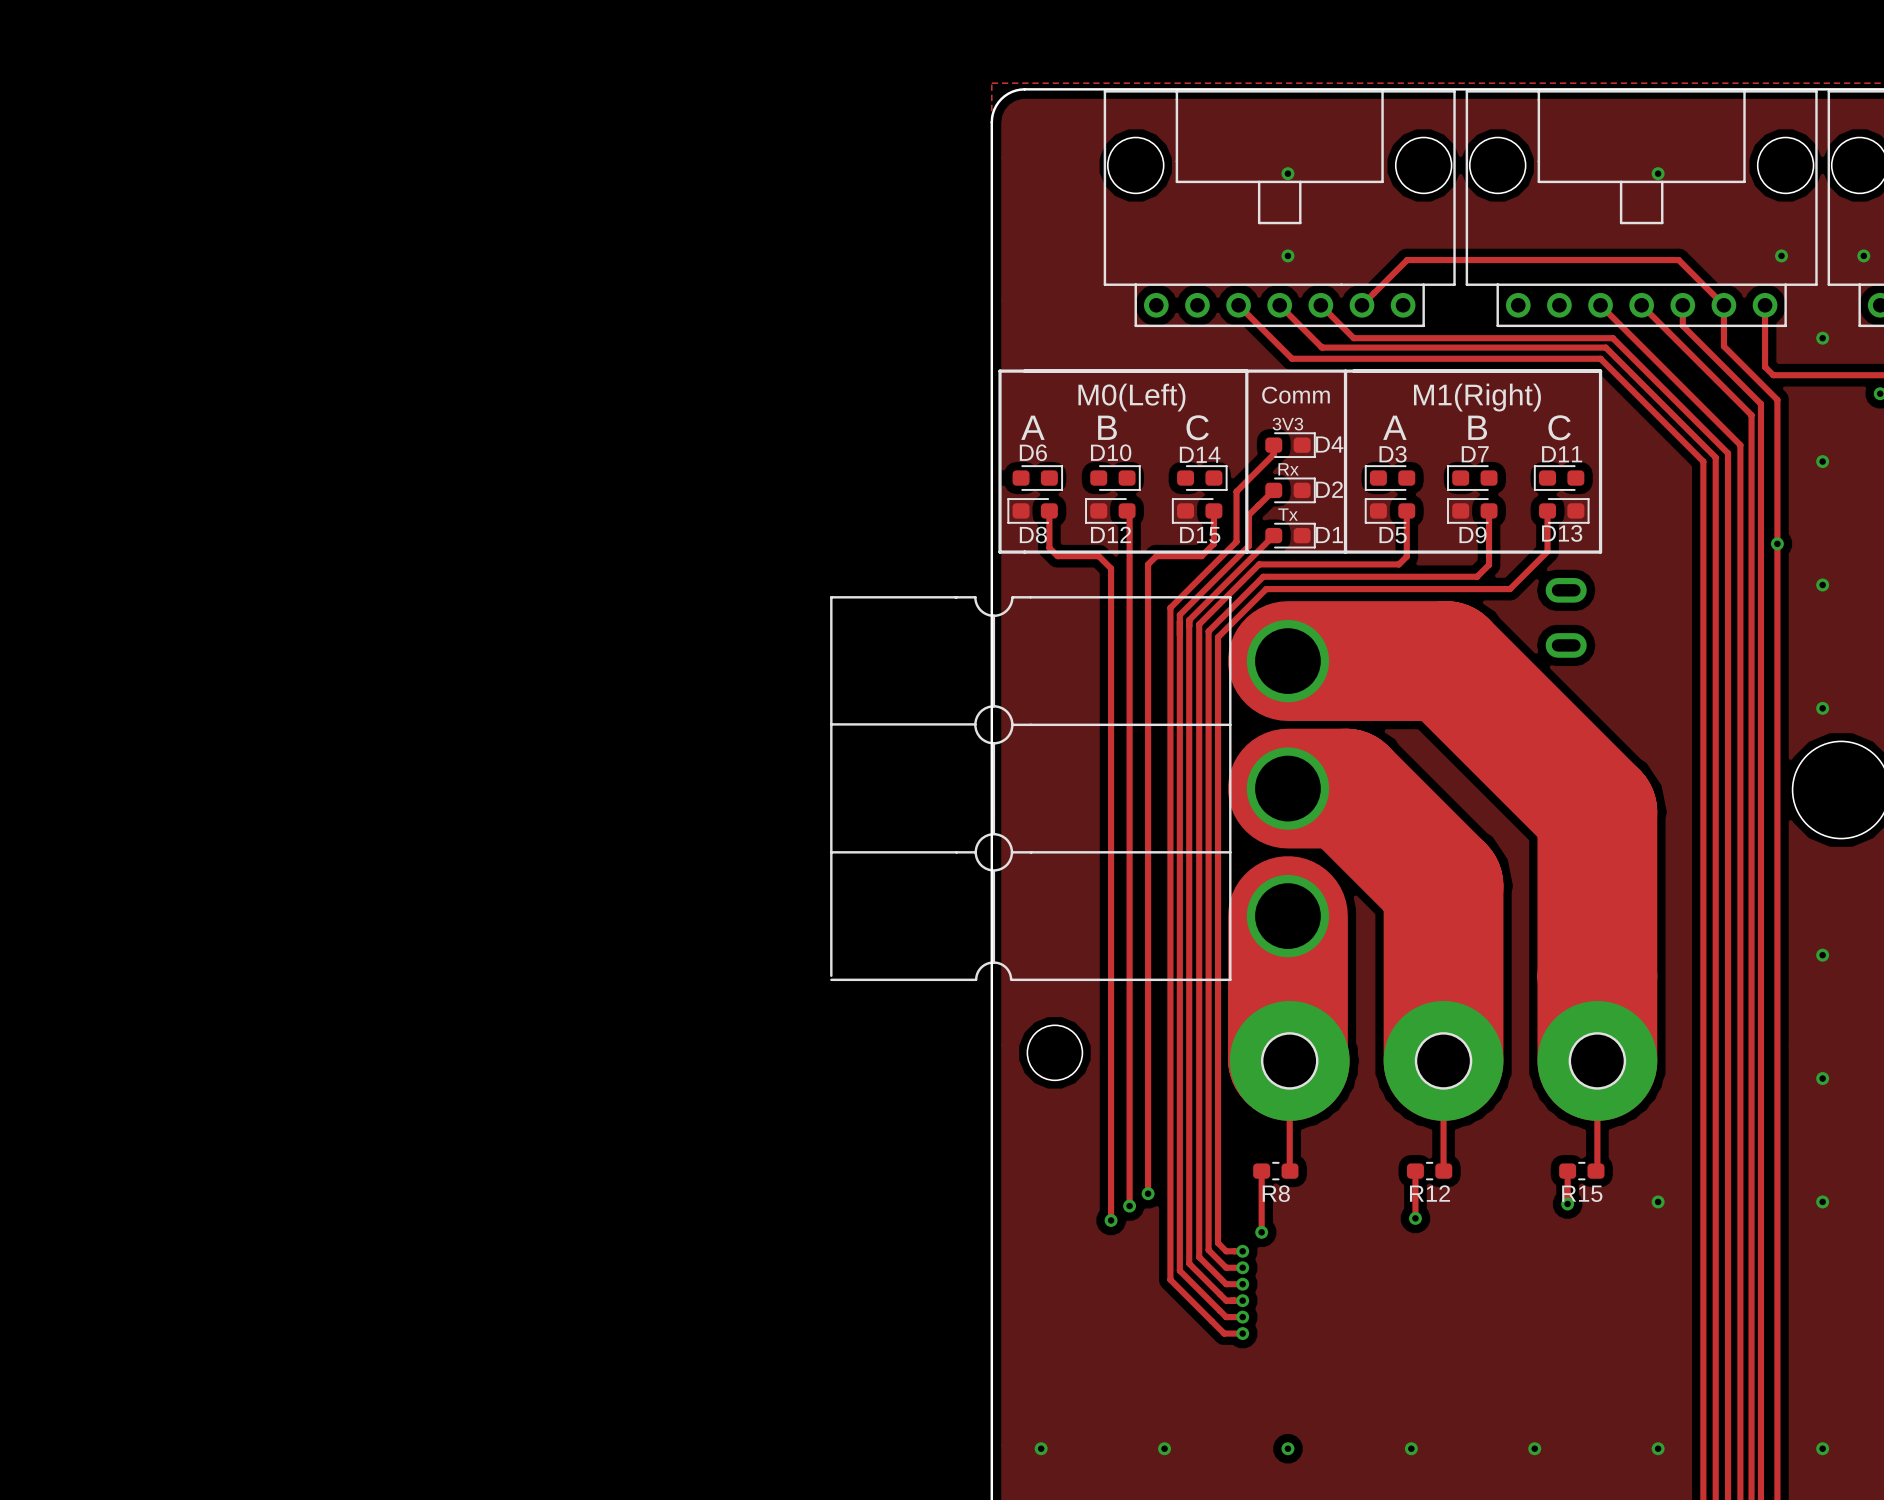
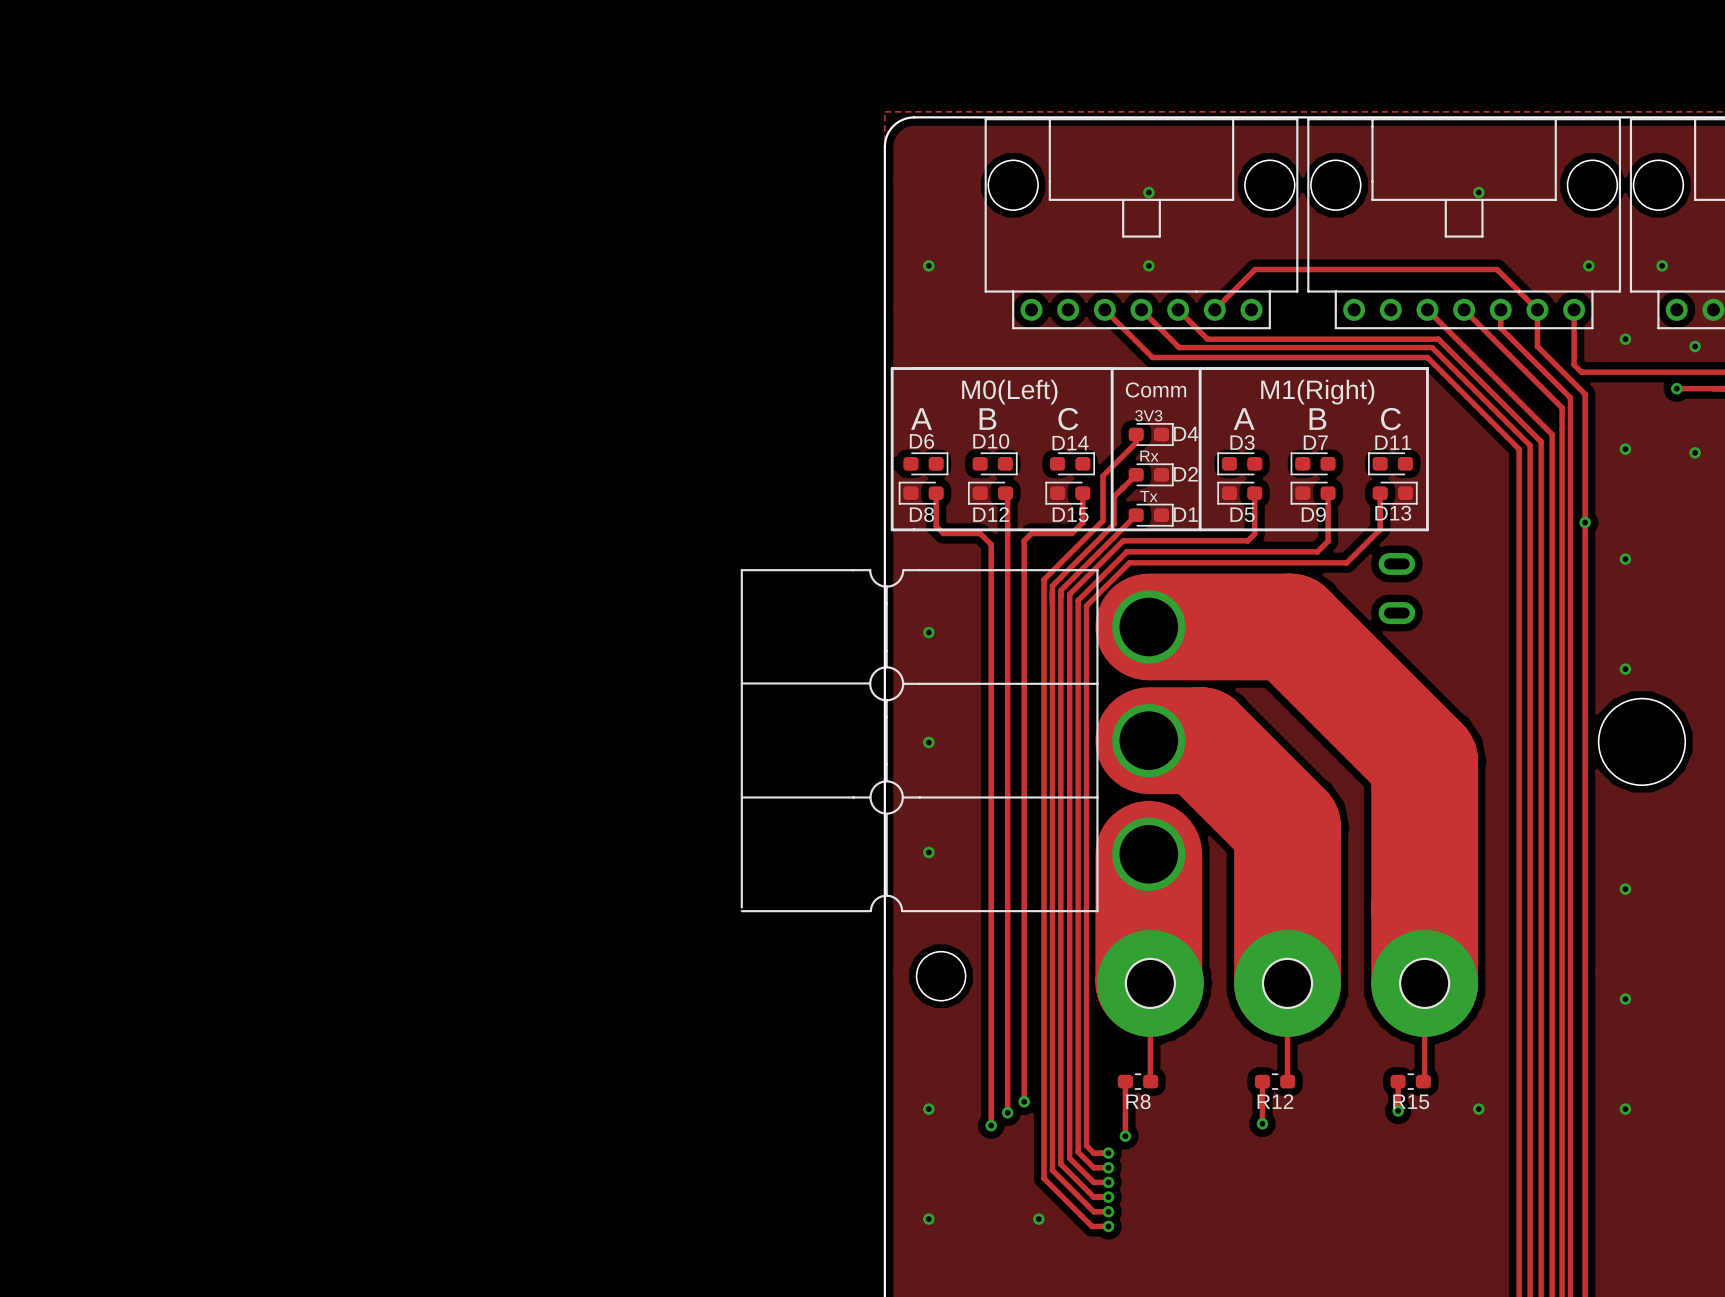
via: none -> (928, 265)
via: none -> (928, 632)
via: none -> (928, 742)
via: none -> (928, 852)
via: none -> (928, 1109)
via: none -> (928, 1219)
via: none -> (1038, 1219)

